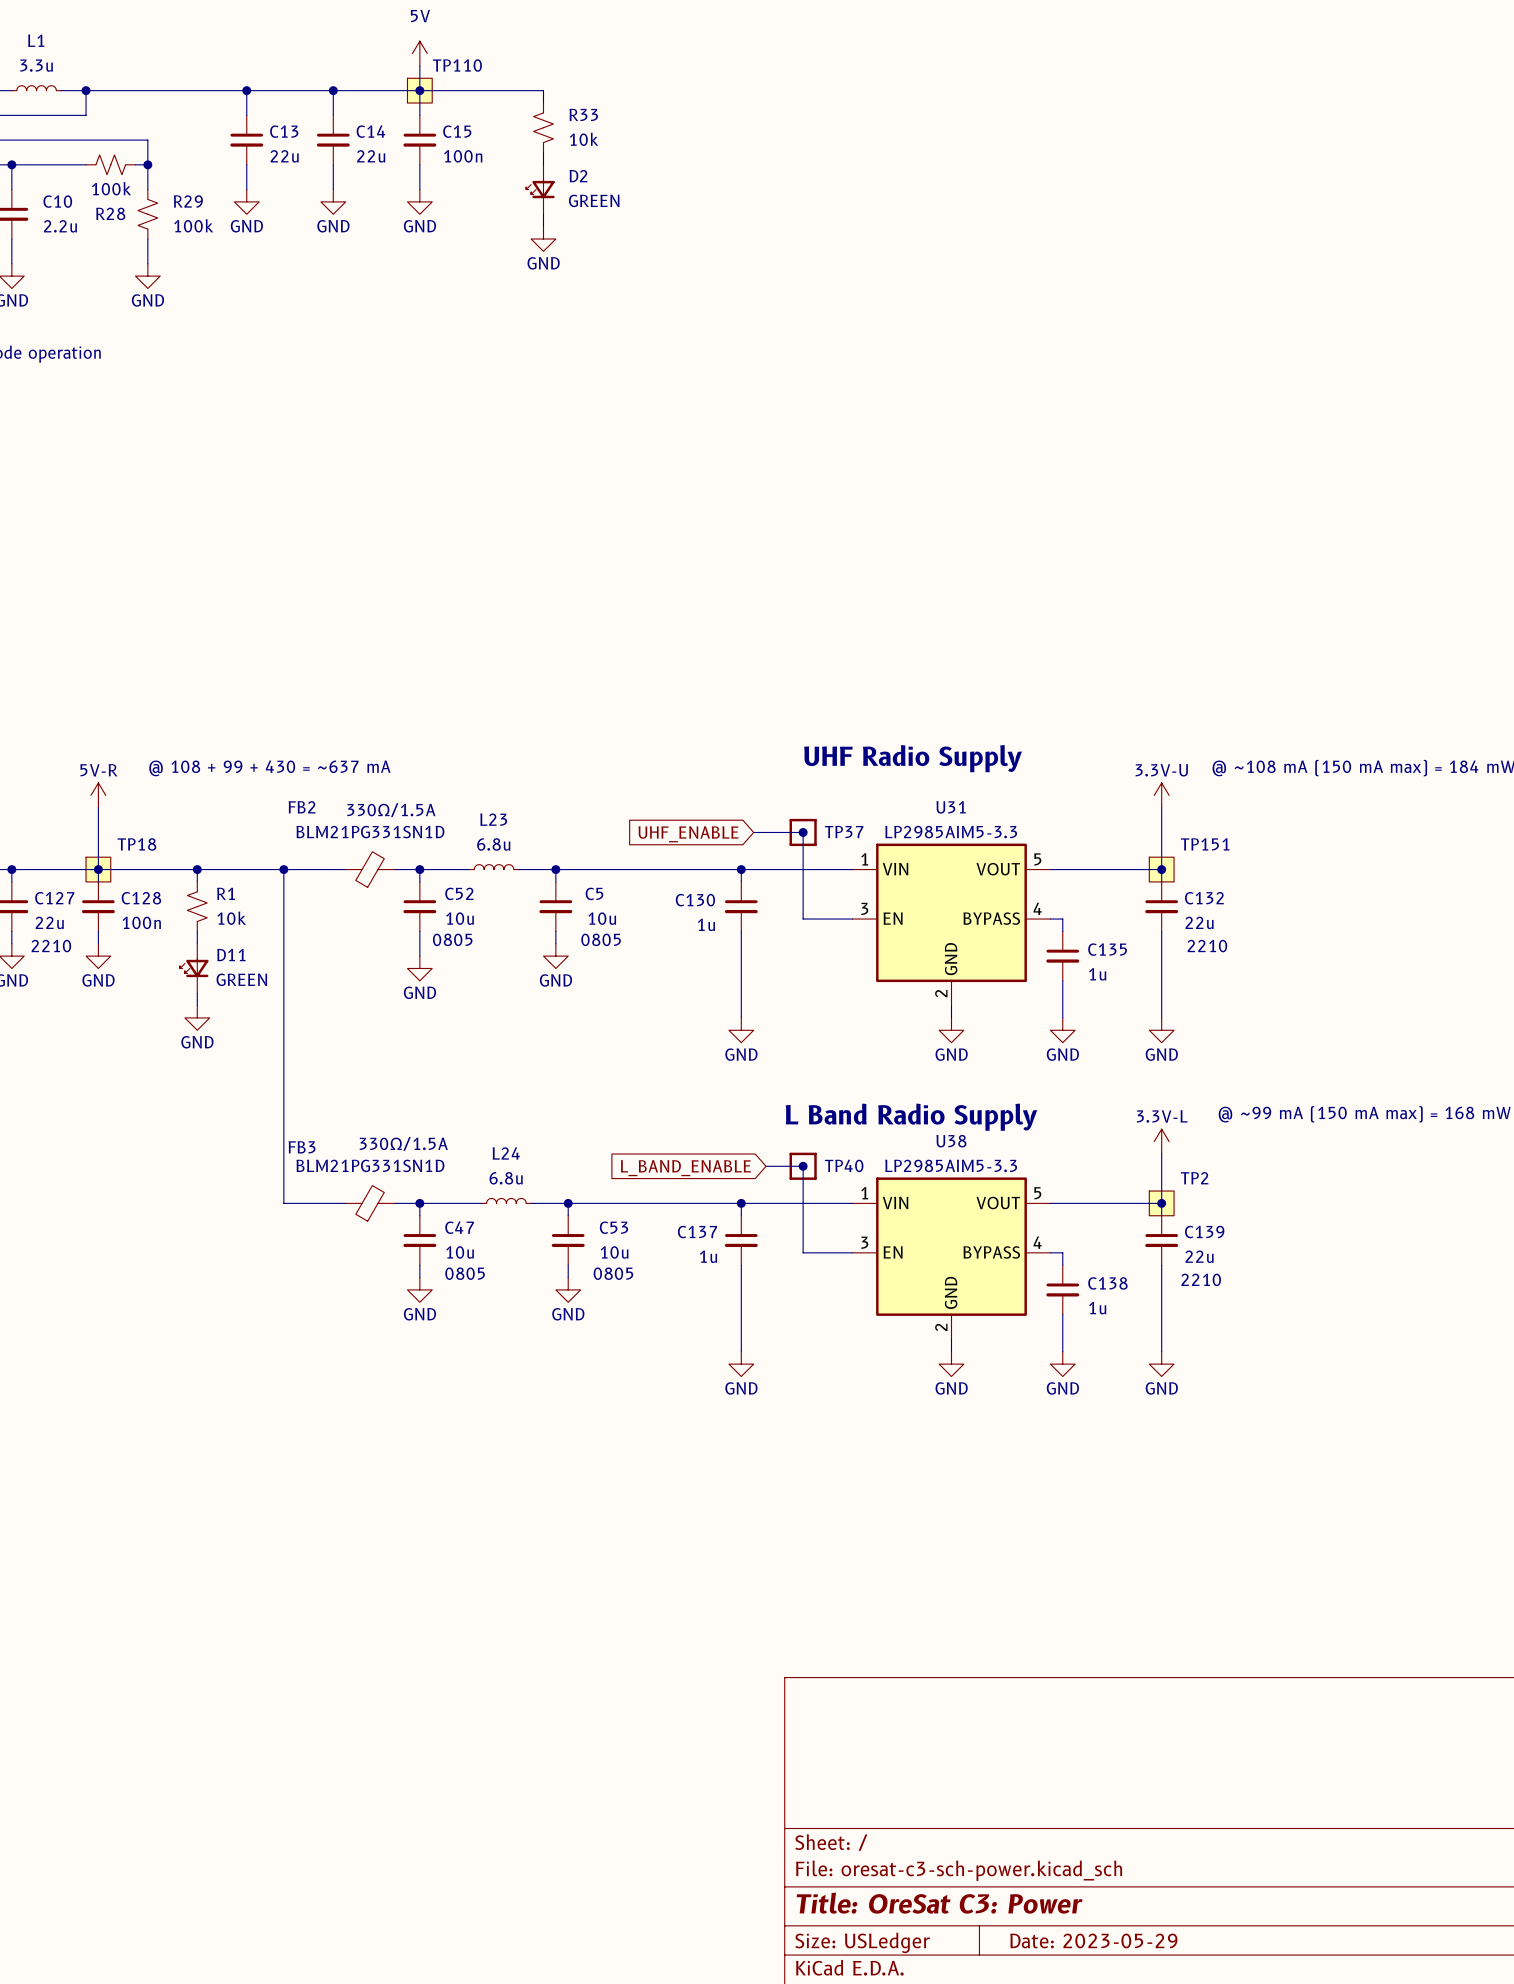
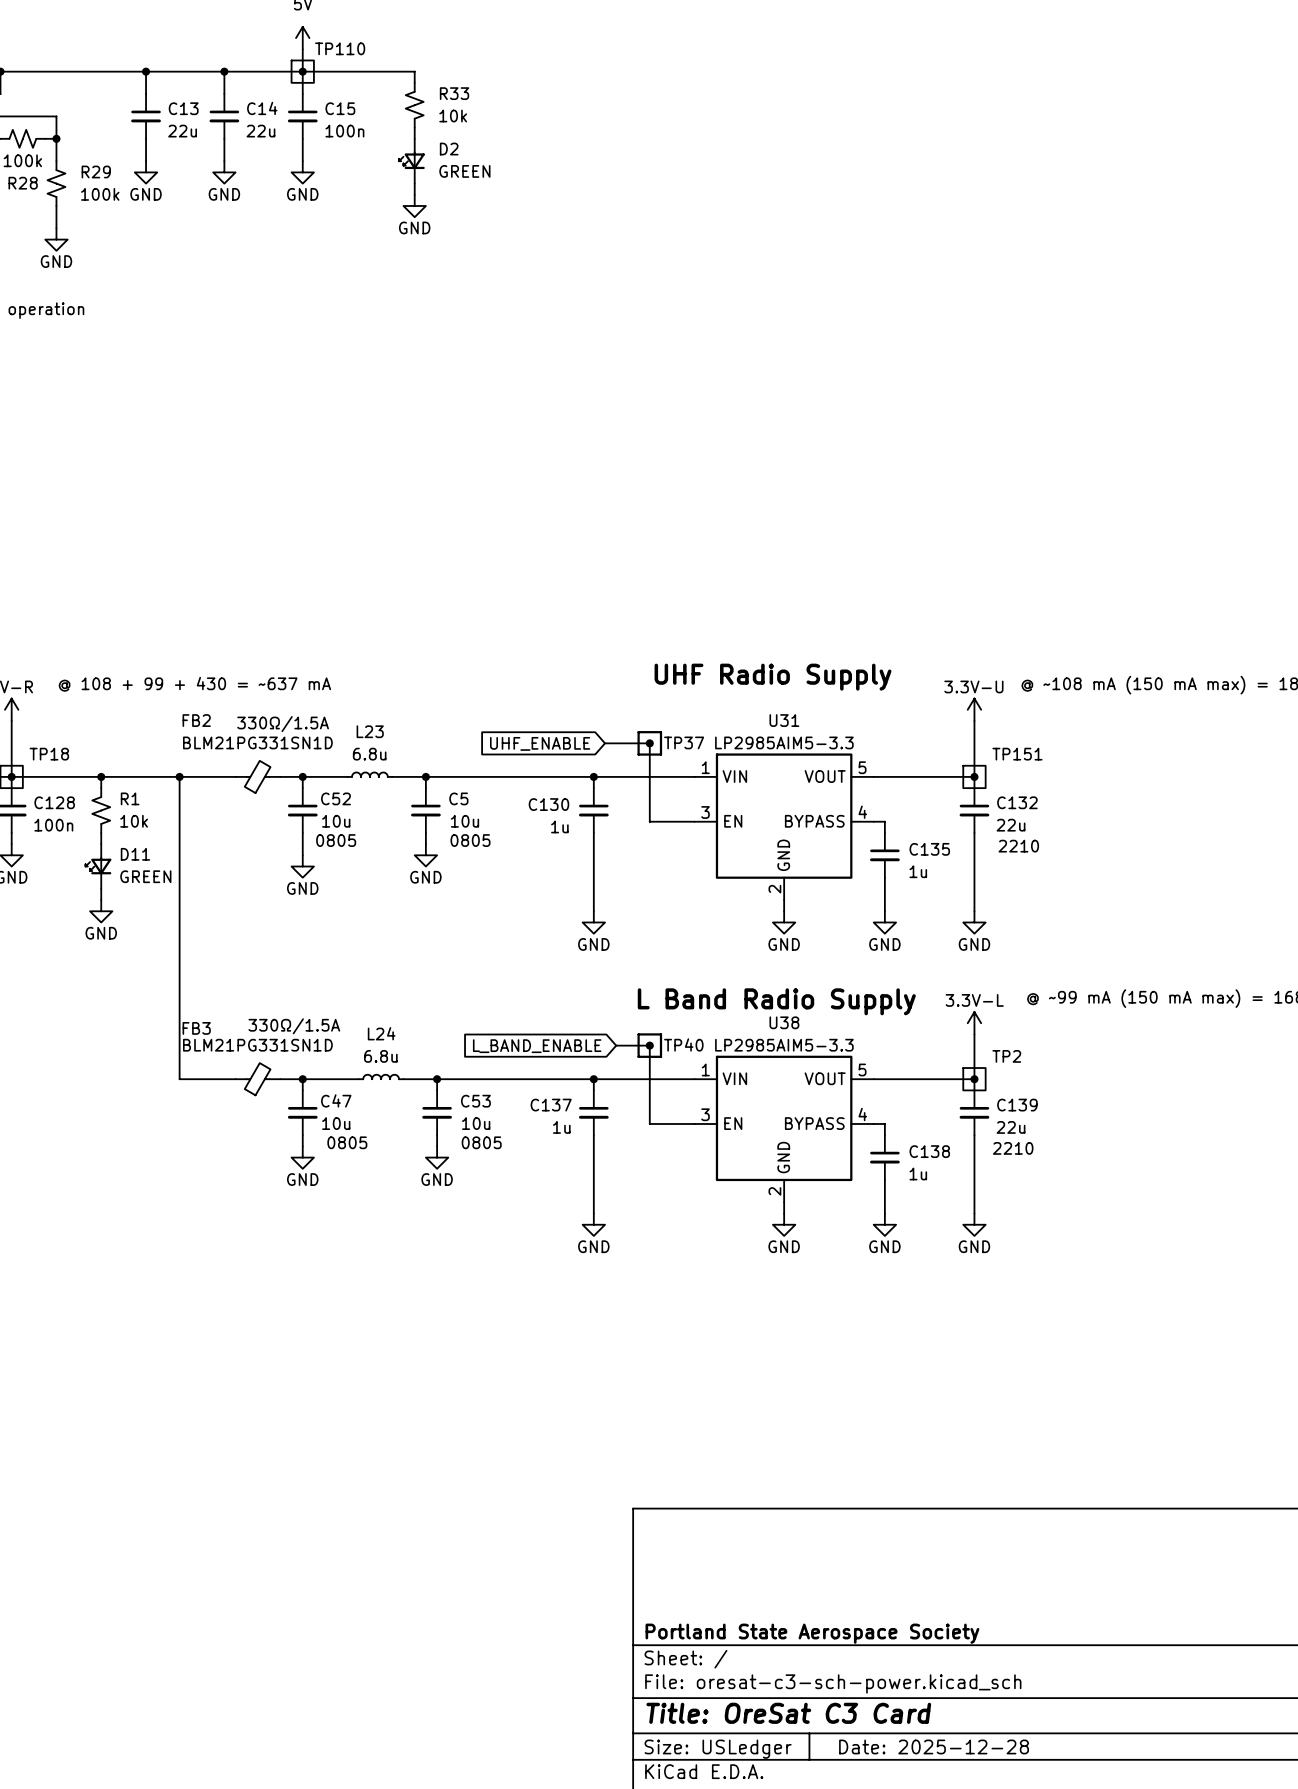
title block: none -> Portland State Aerospace Society (812, 1633)
title block: Title: OreSat C3: Power (939, 1903) -> Title: OreSat C3 Card (788, 1713)
title block: Date: 2023-05-29 (1093, 1940) -> Date: 2025-12-28 (934, 1746)

